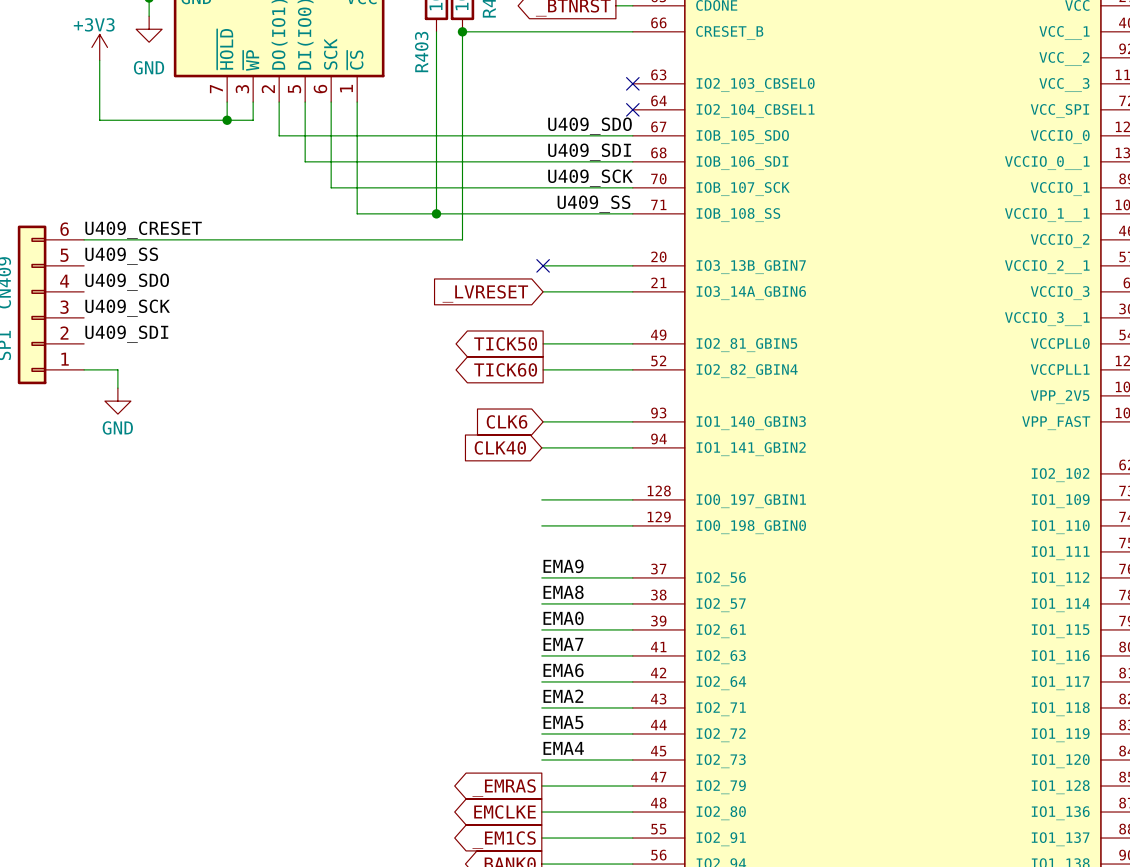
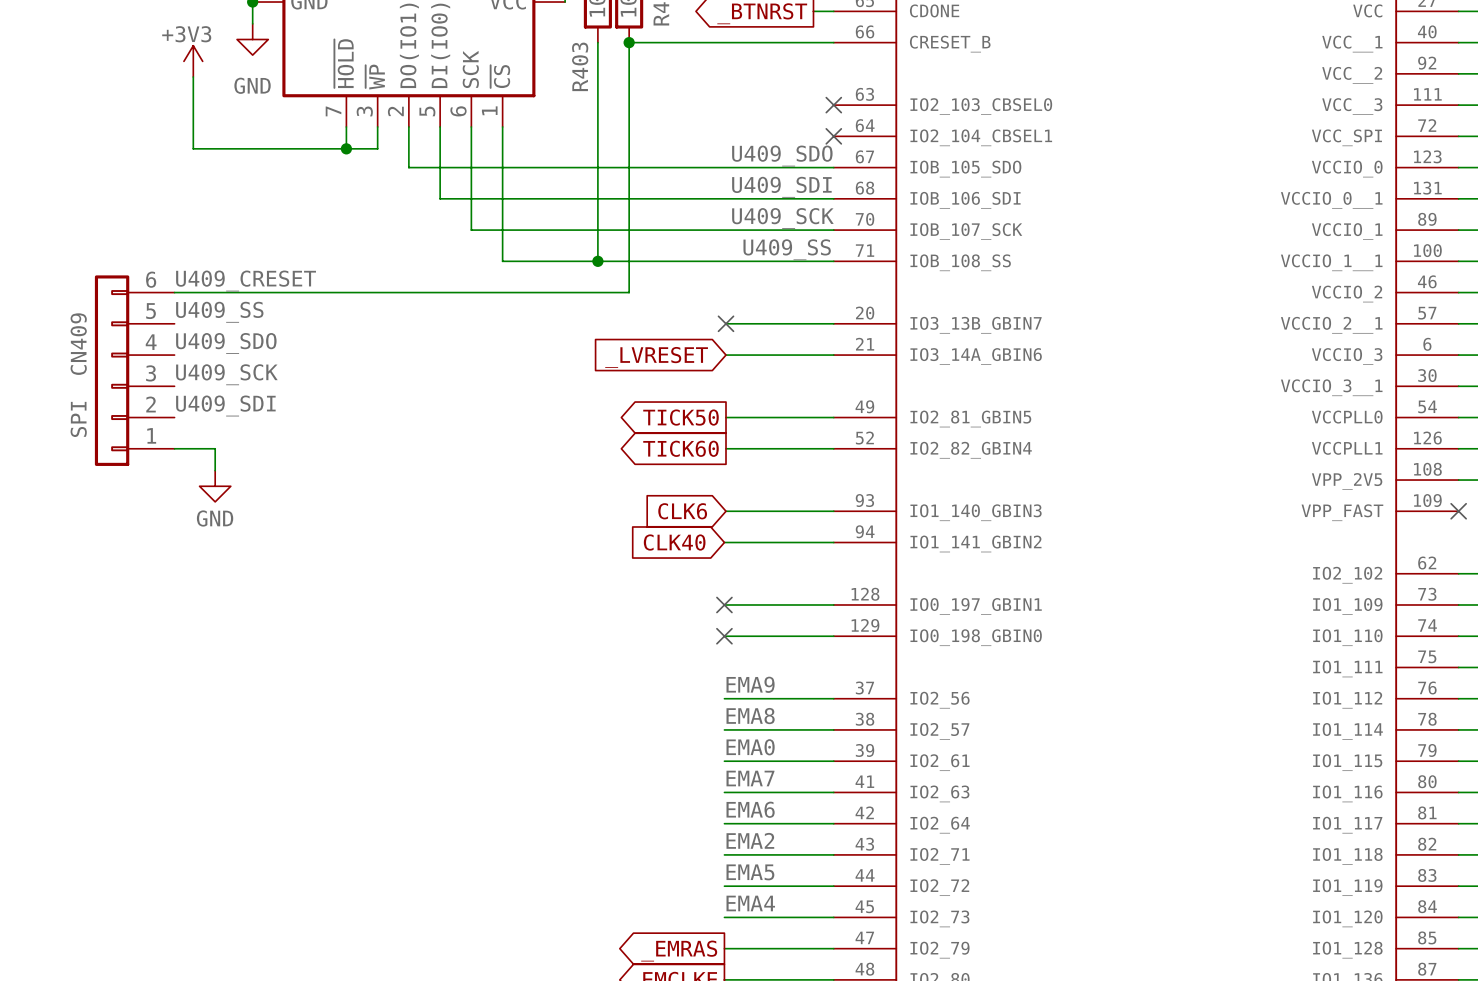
no-connect mark: none -> (724, 604)
no-connect mark: none -> (724, 636)

